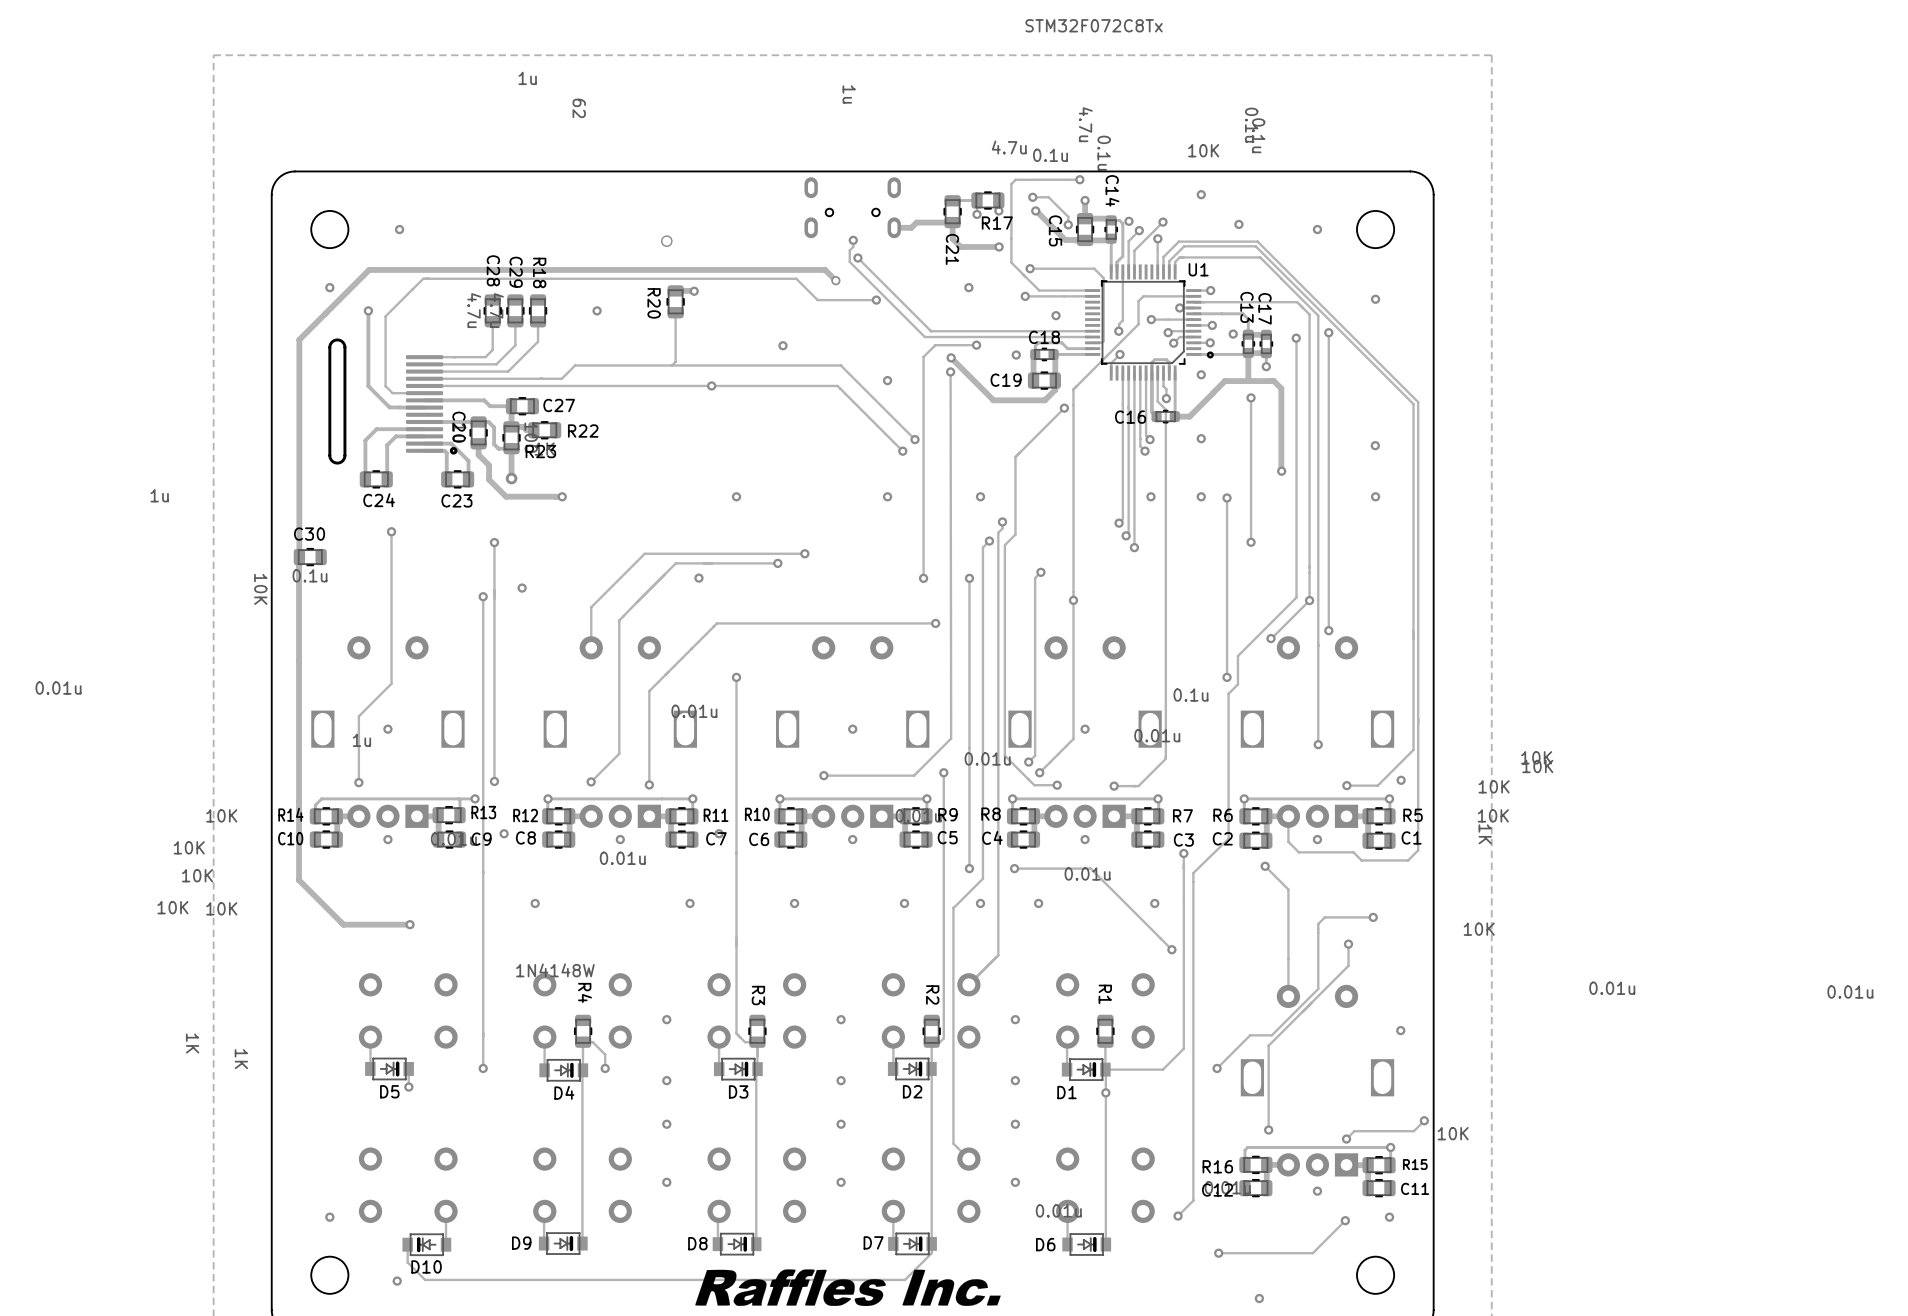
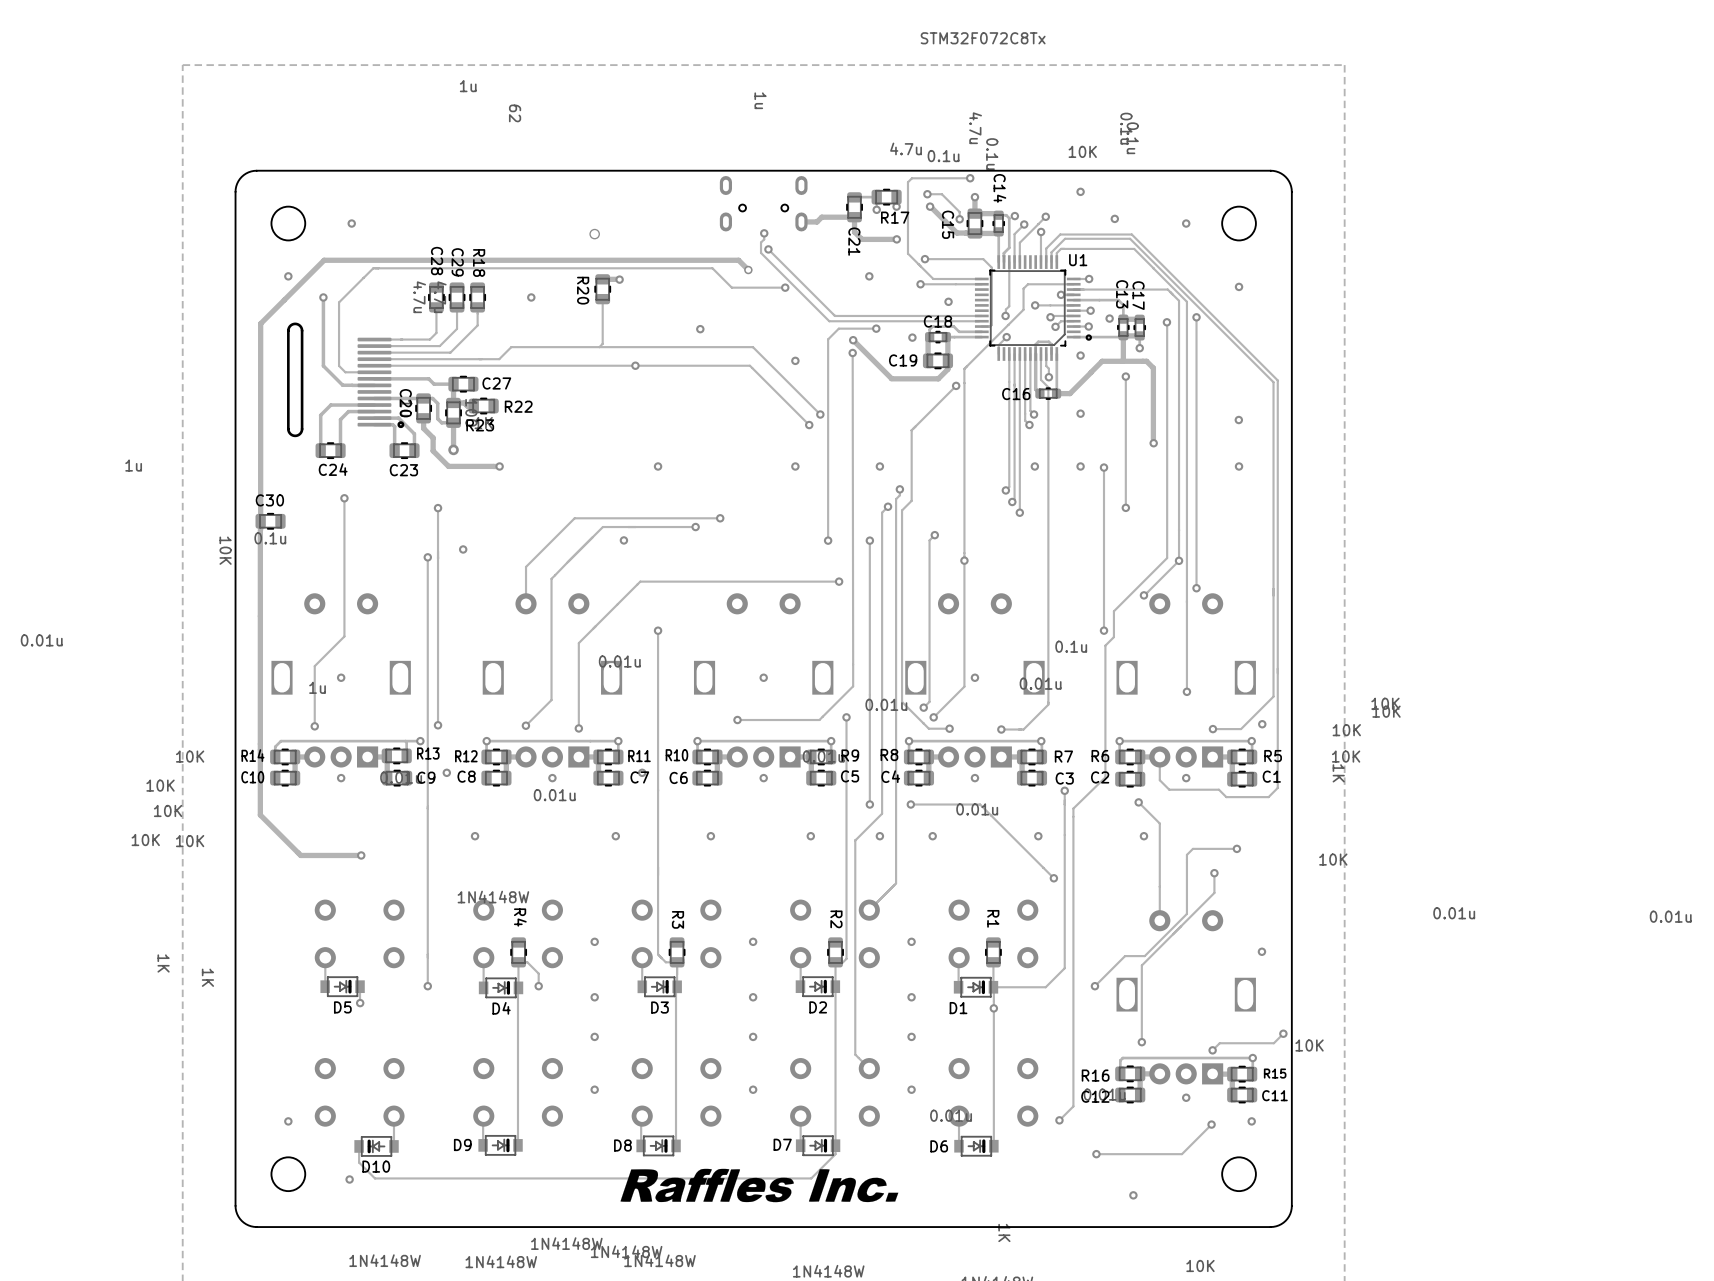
via: none -> (1143, 836)

